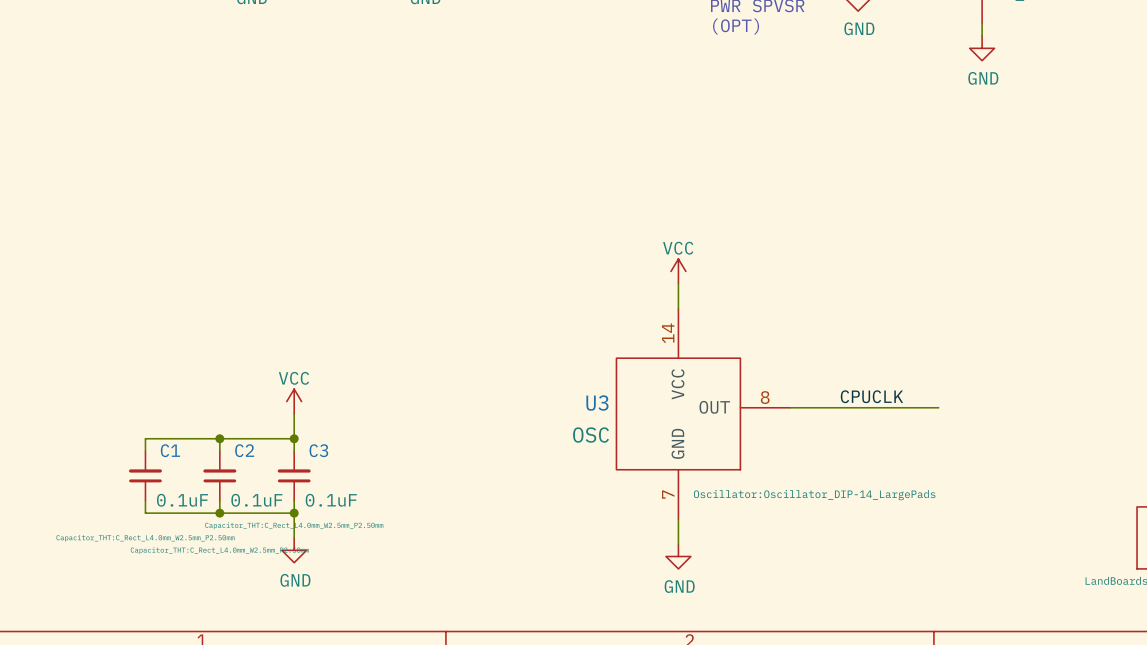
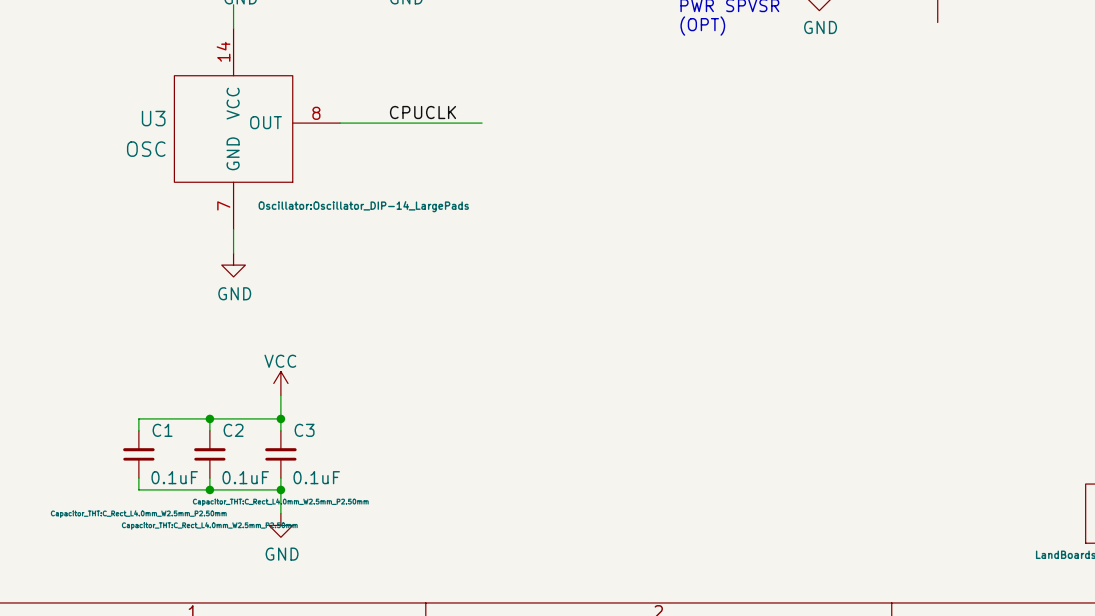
wire: none -> (233, 4) (233, 28)
wire: (982, 23) (982, 35) -> none
power symbol: GND (982, 48) -> none
label: none -> CPUCLK (423, 112)
wire: none -> (340, 123) (482, 123)
wire: none -> (233, 229) (233, 253)
power symbol: VCC (678, 271) -> none
power symbol: none -> GND (233, 265)
wire: (678, 283) (678, 308) -> none
label: CPUCLK (871, 396) -> none
wire: (789, 407) (938, 407) -> none
U3 position: (703, 413) -> (257, 128)
wire: (678, 519) (678, 544) -> none
power symbol: GND (678, 556) -> none

